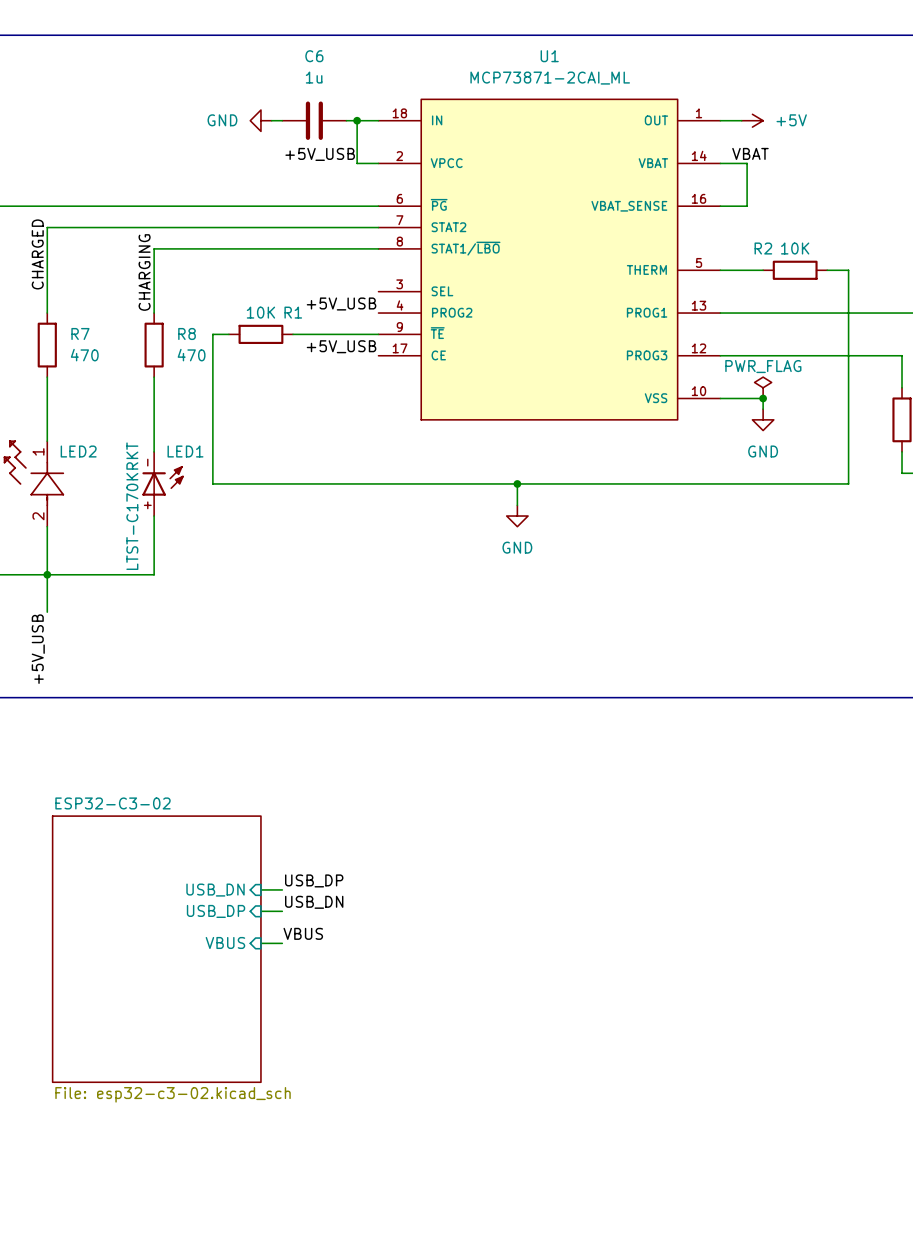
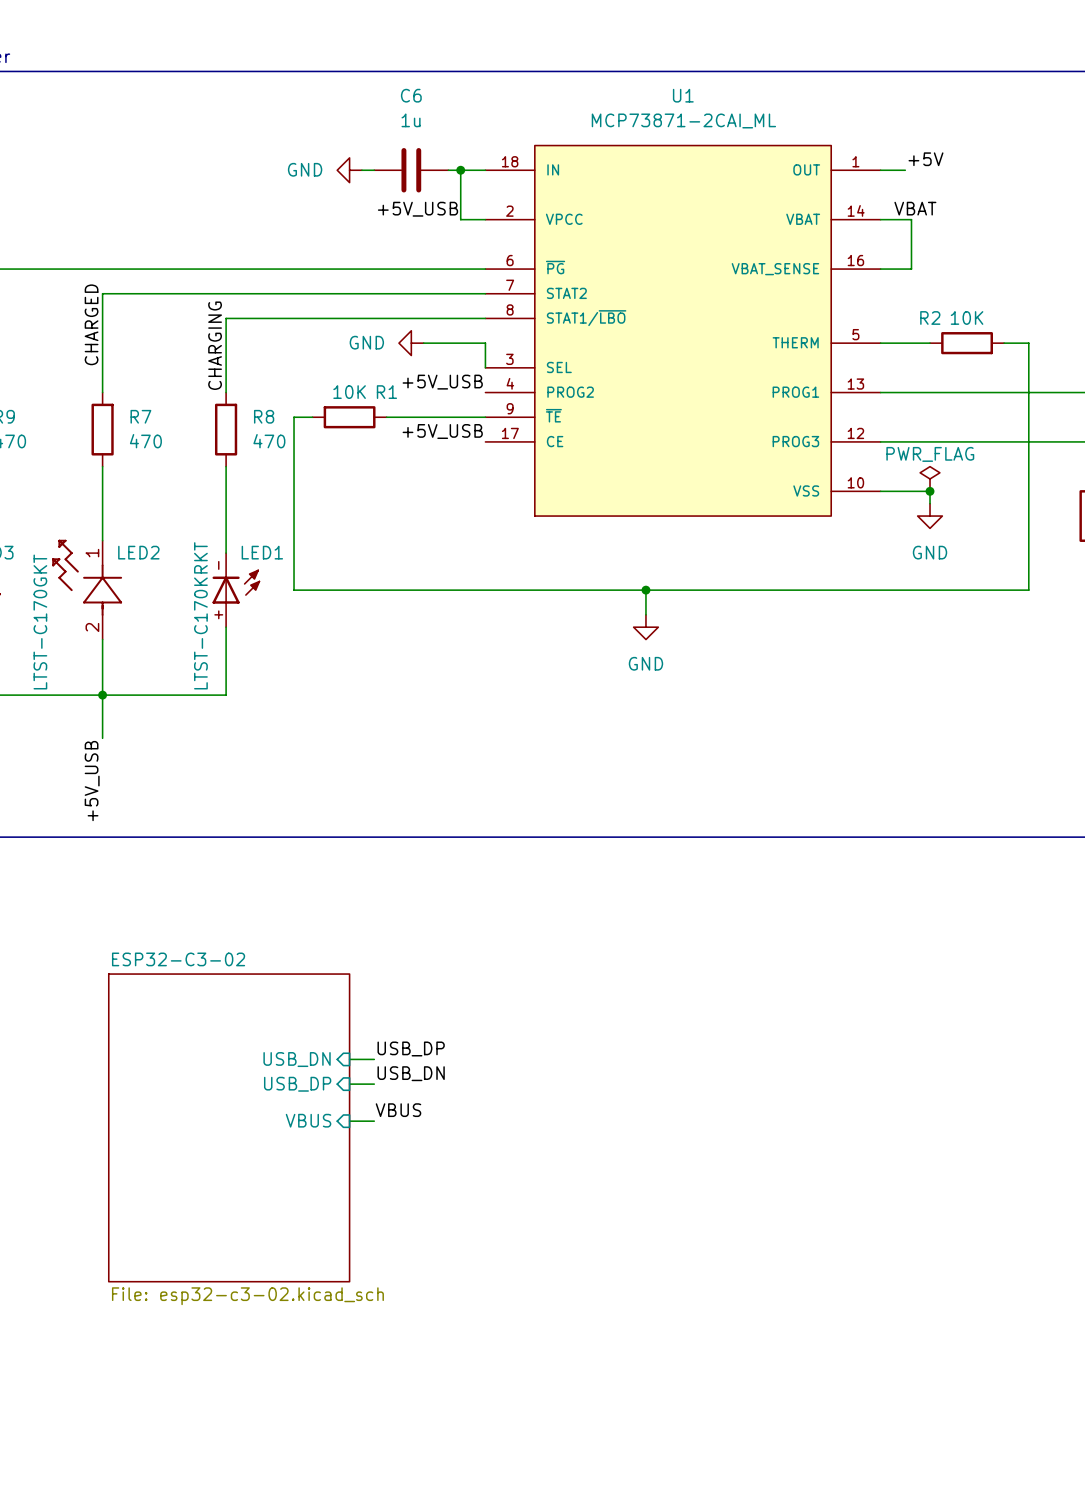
label: none -> +5V (925, 159)
power symbol: +5V (752, 120) -> none
power symbol: none -> GND (411, 343)
wire: none -> (423, 343) (485, 343) (485, 367)

